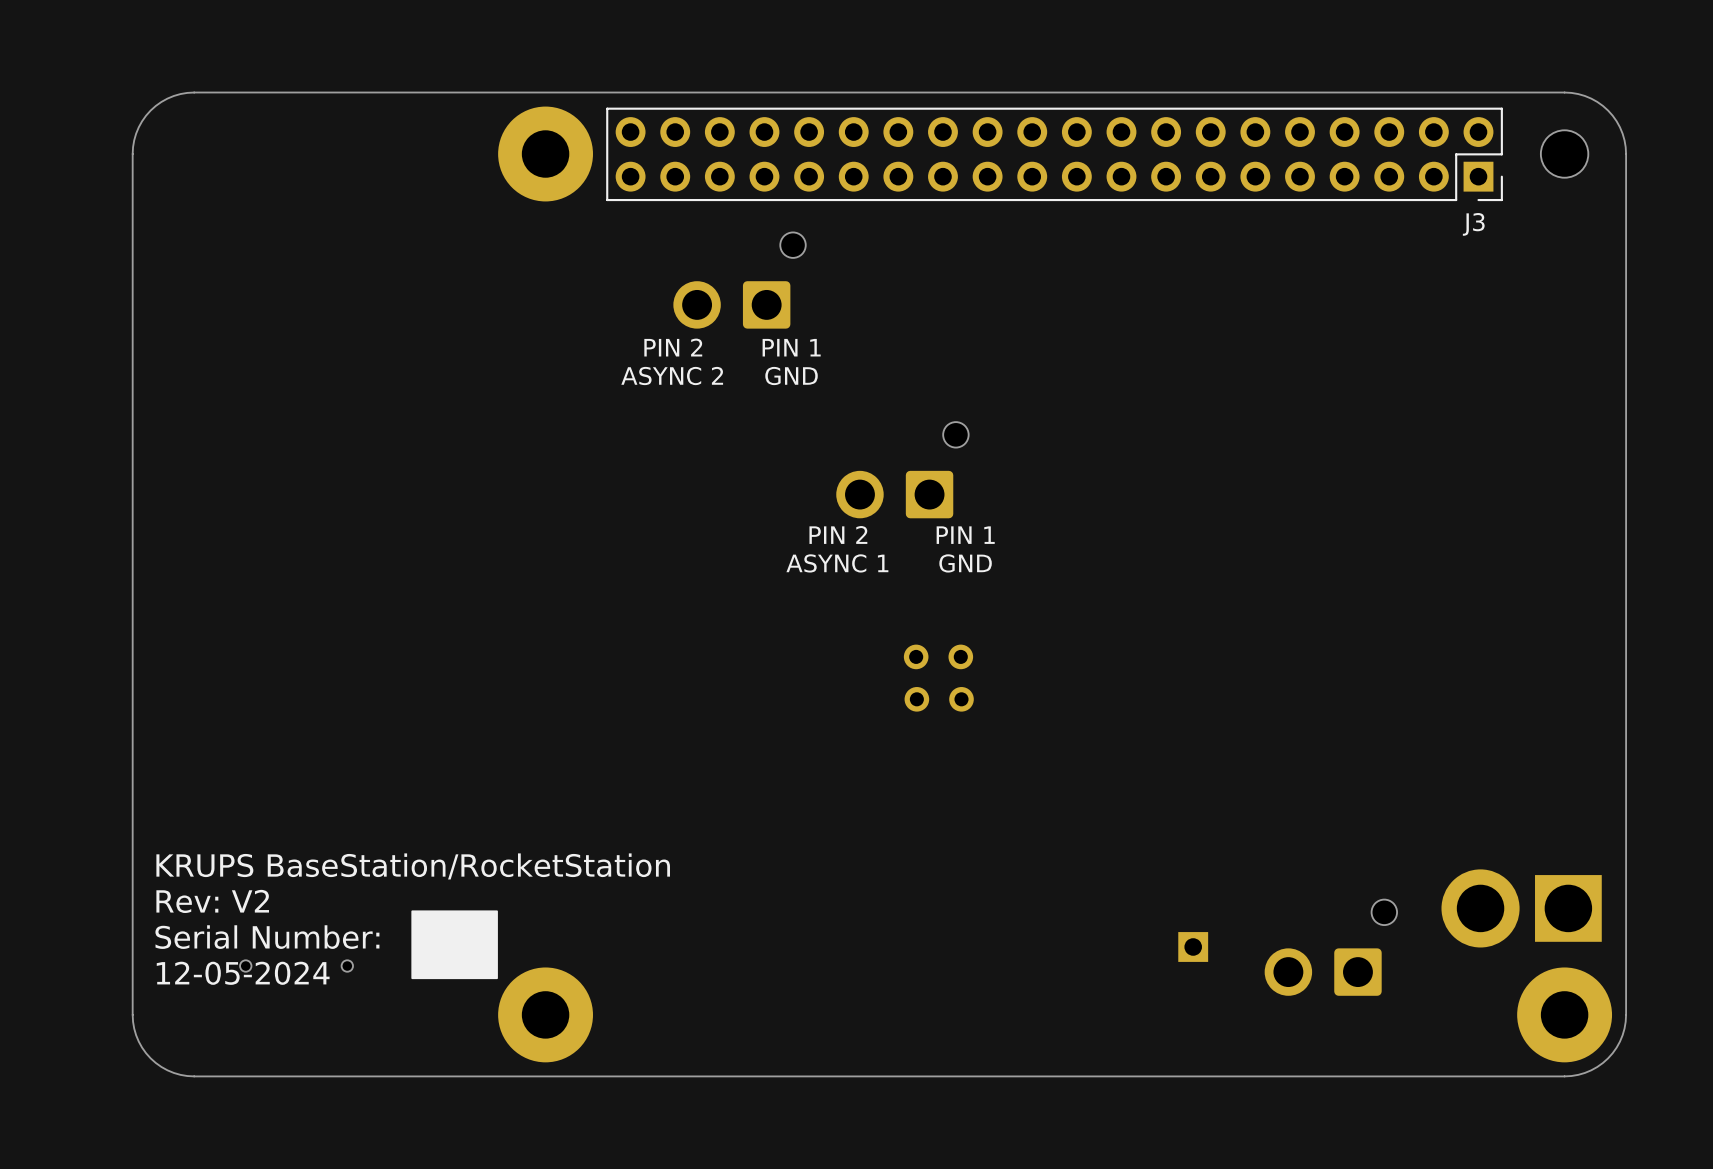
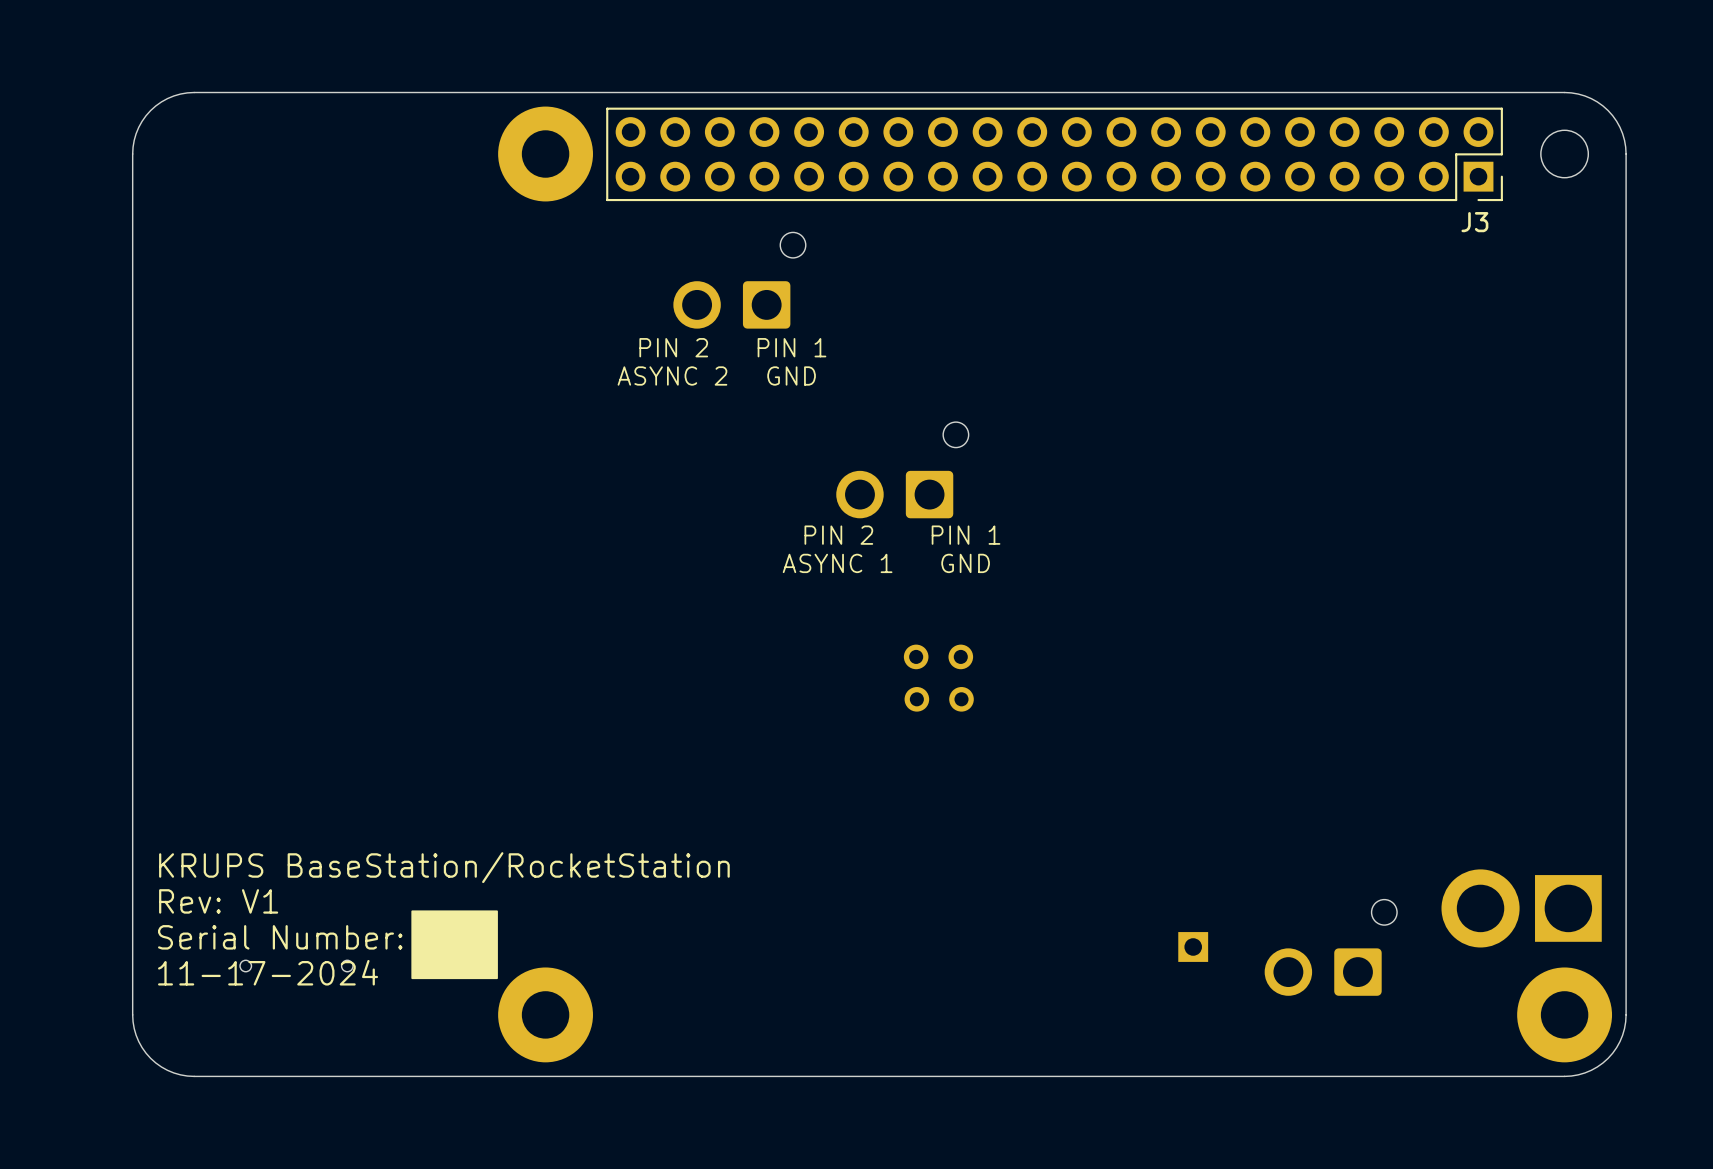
text: Rev: V2 (212, 901) -> Rev: V1 (218, 901)
text: 12-05-2024 (243, 973) -> 11-17-2024 (268, 972)

